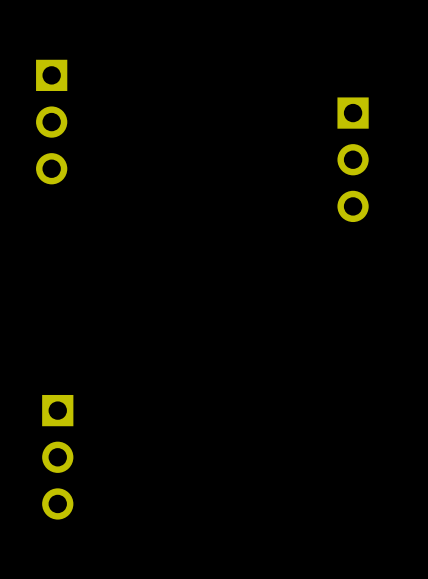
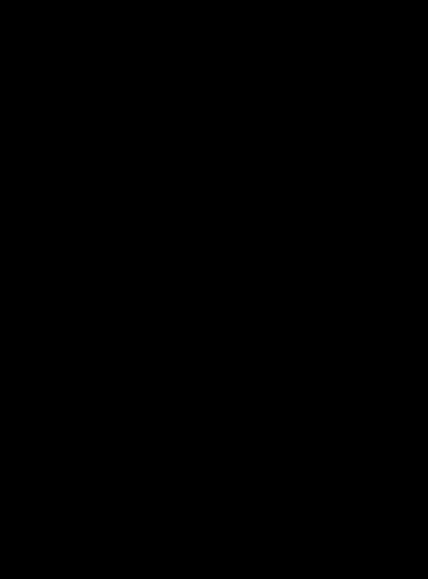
part: (51, 122) -> none
part: (353, 159) -> none
part: (57, 457) -> none

